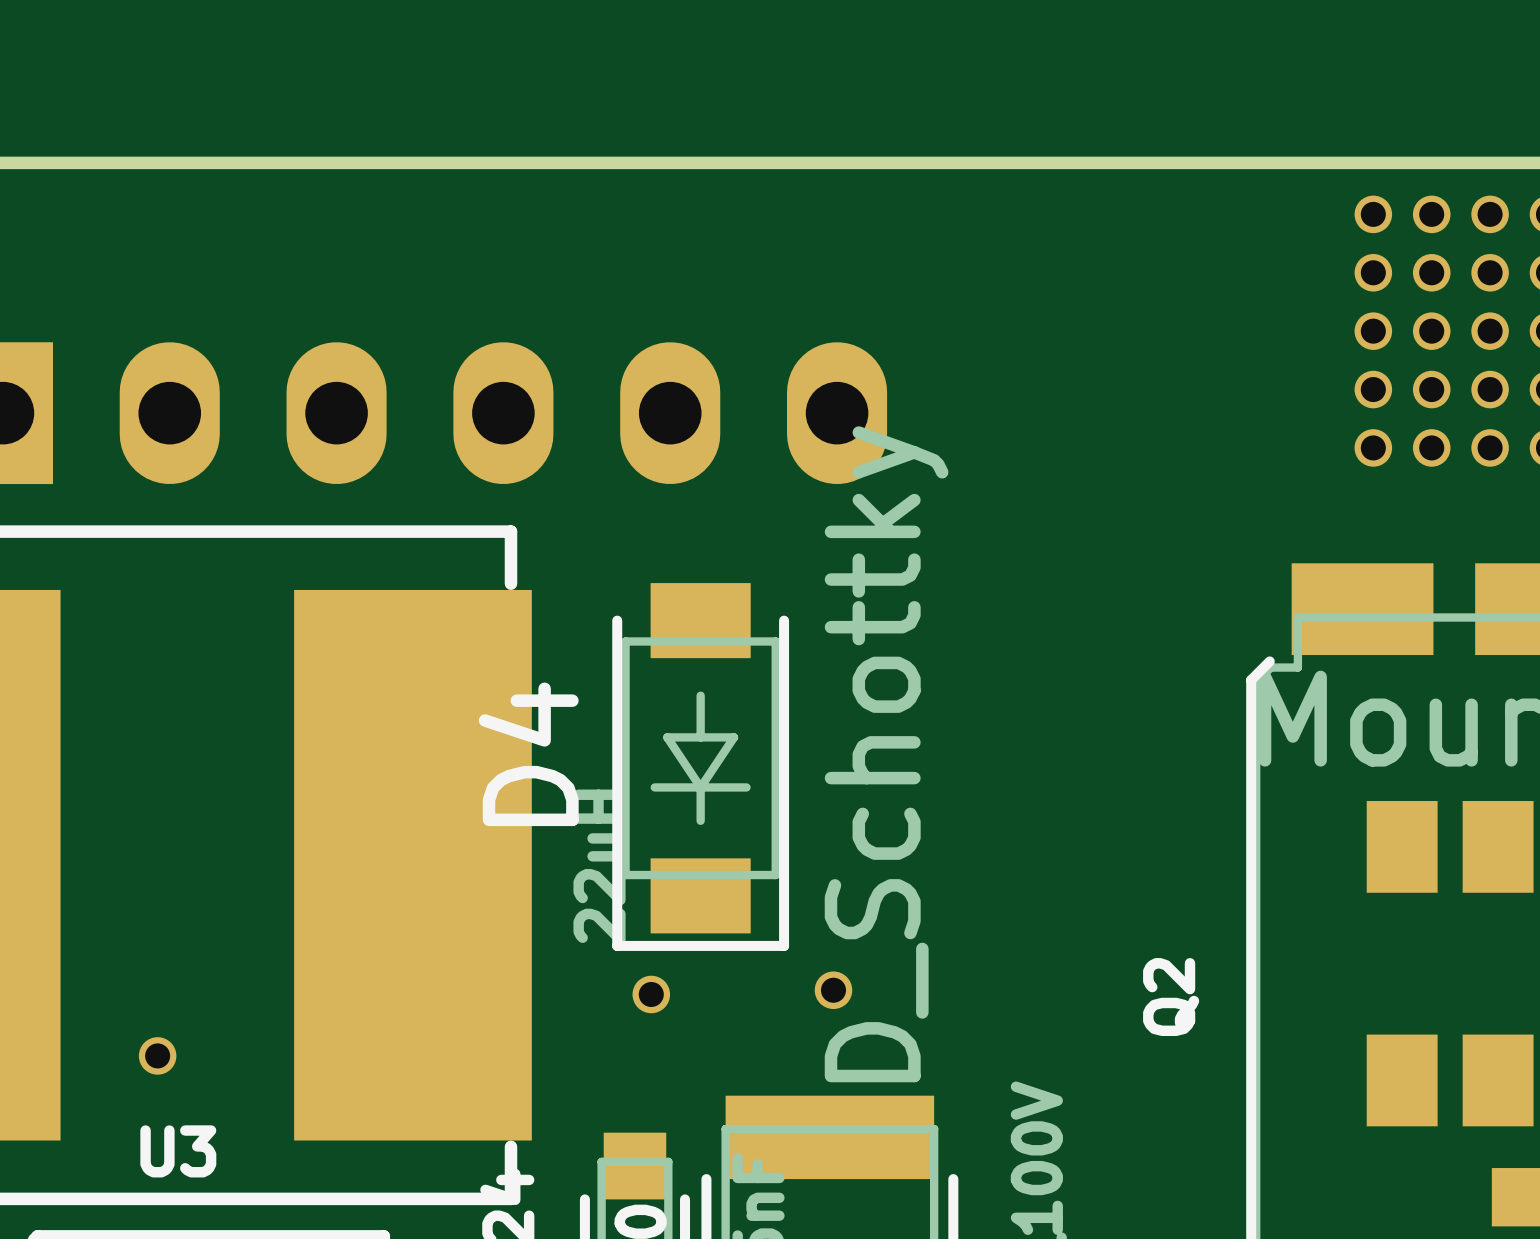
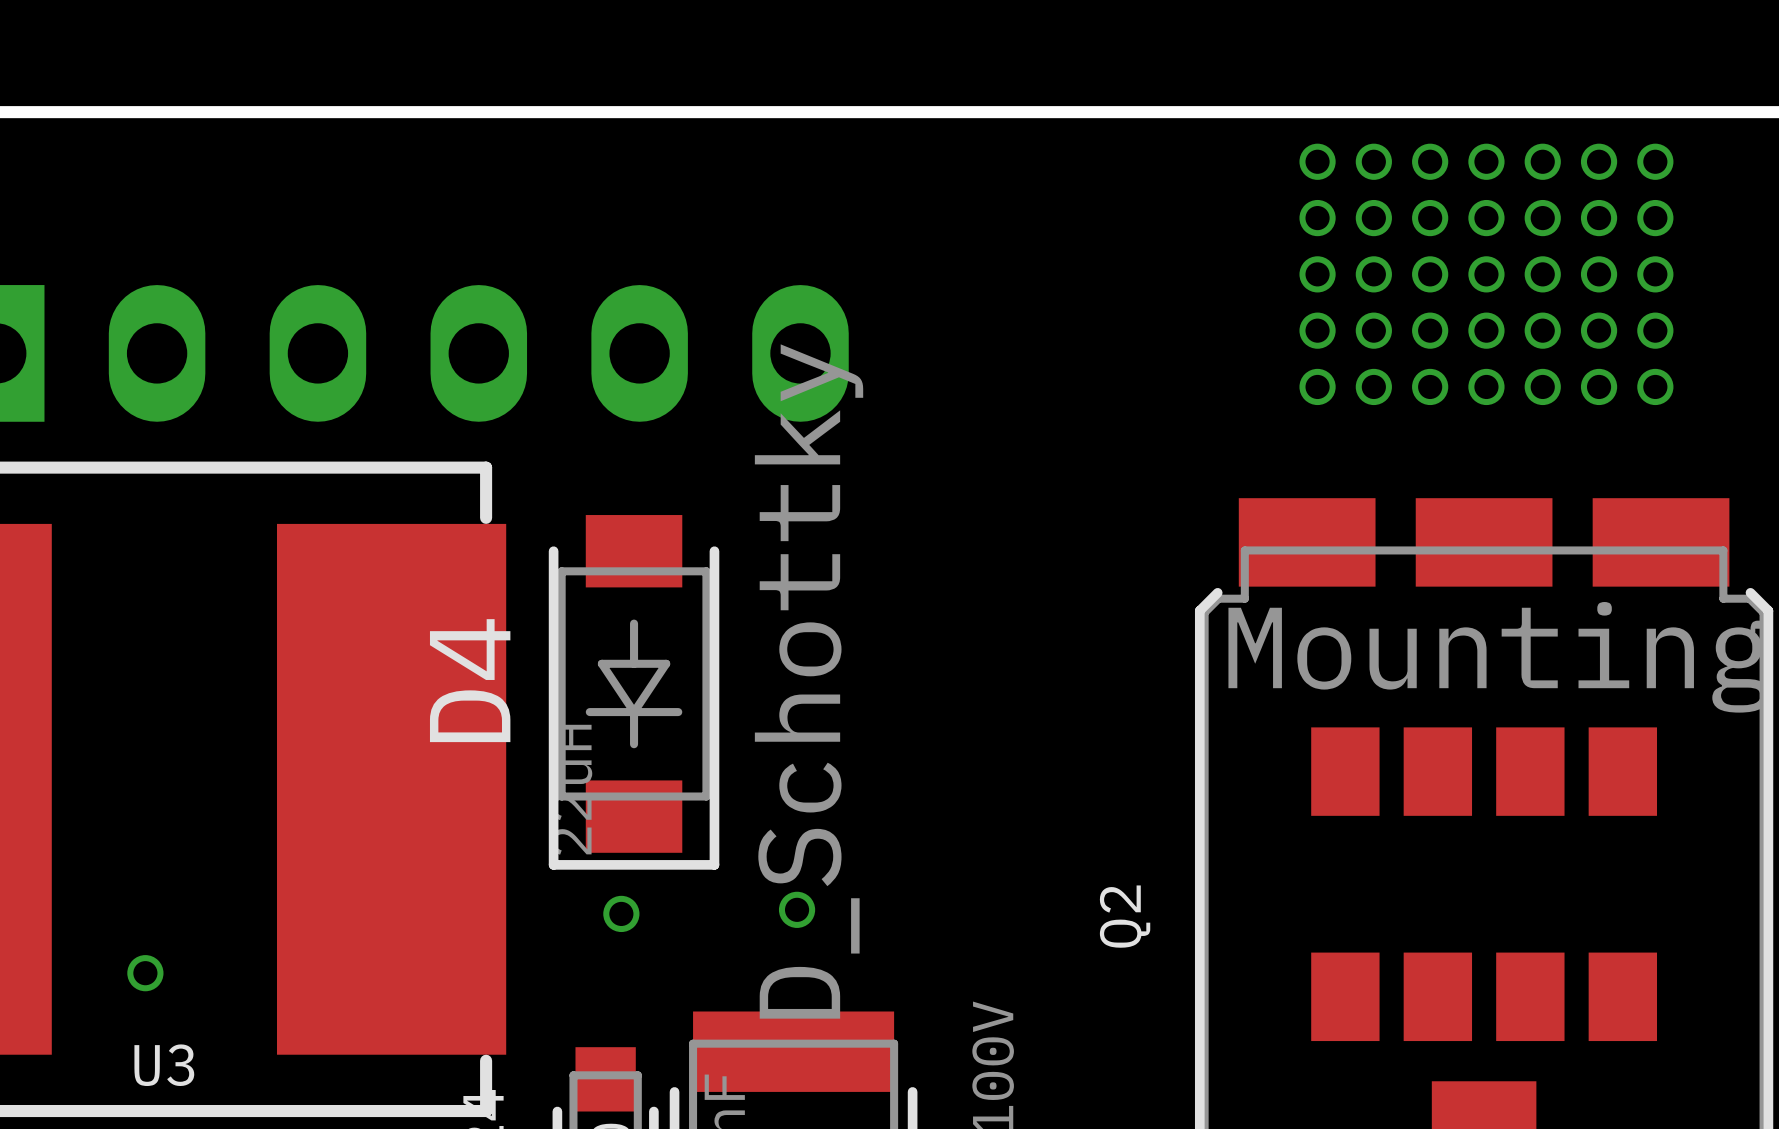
D4 position: (700, 767) -> (634, 692)

